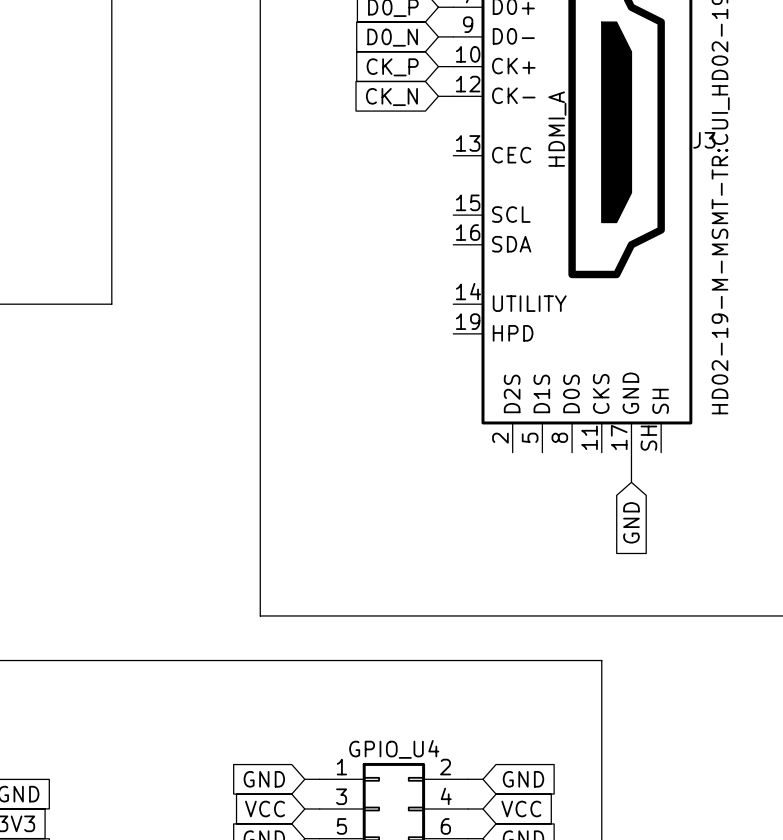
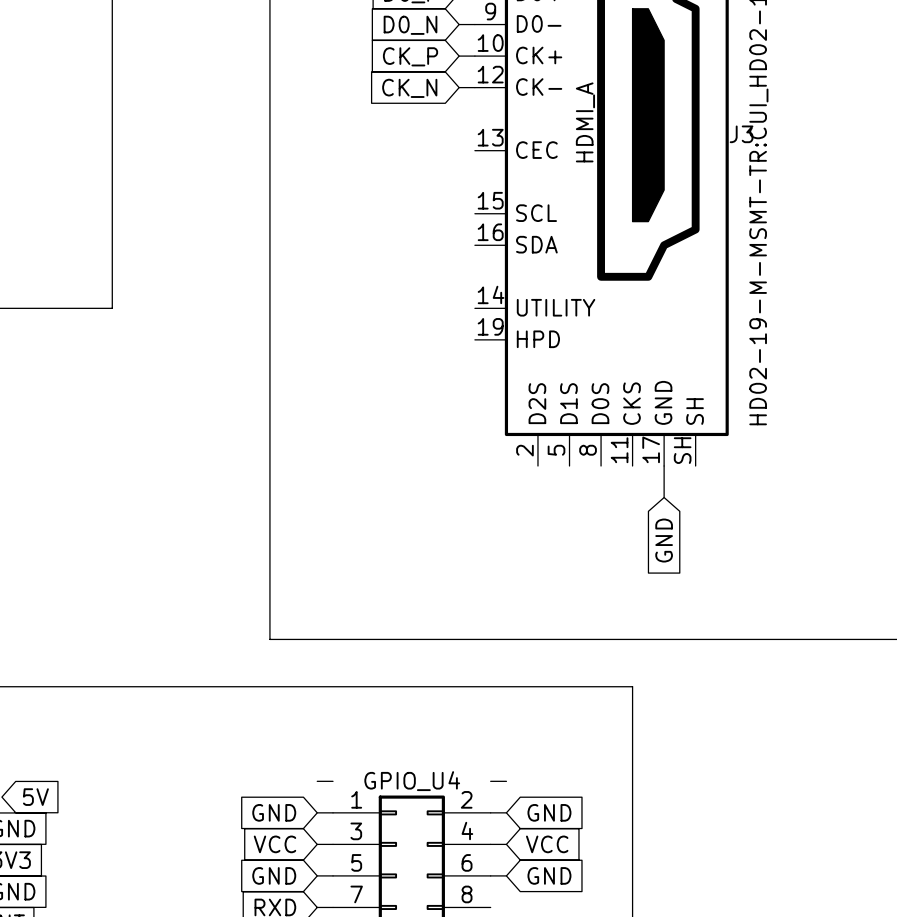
wire: none -> (317, 781) (333, 781)
wire: none -> (490, 781) (506, 781)
global label: none -> 5V (35, 797)

